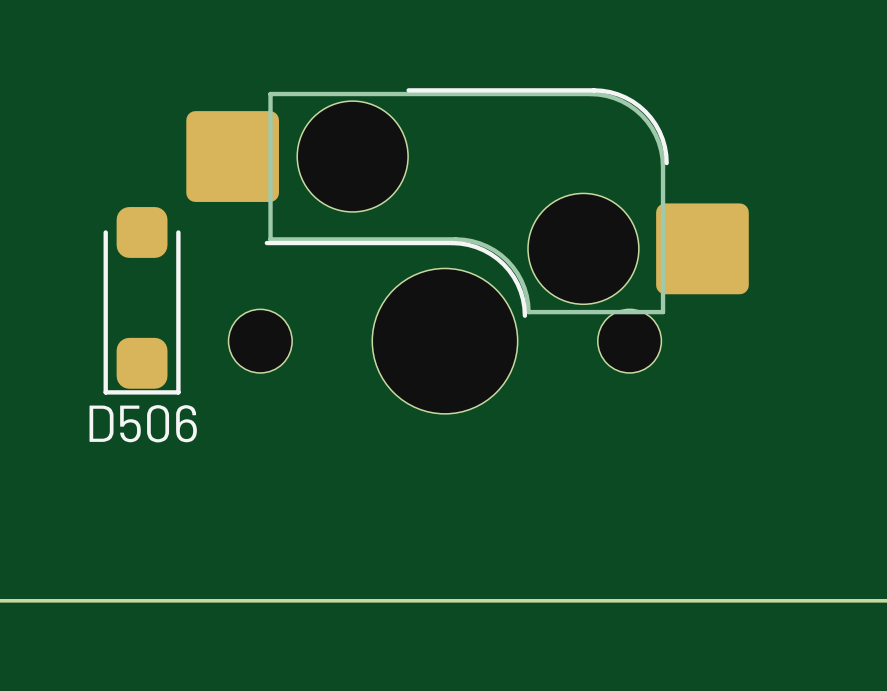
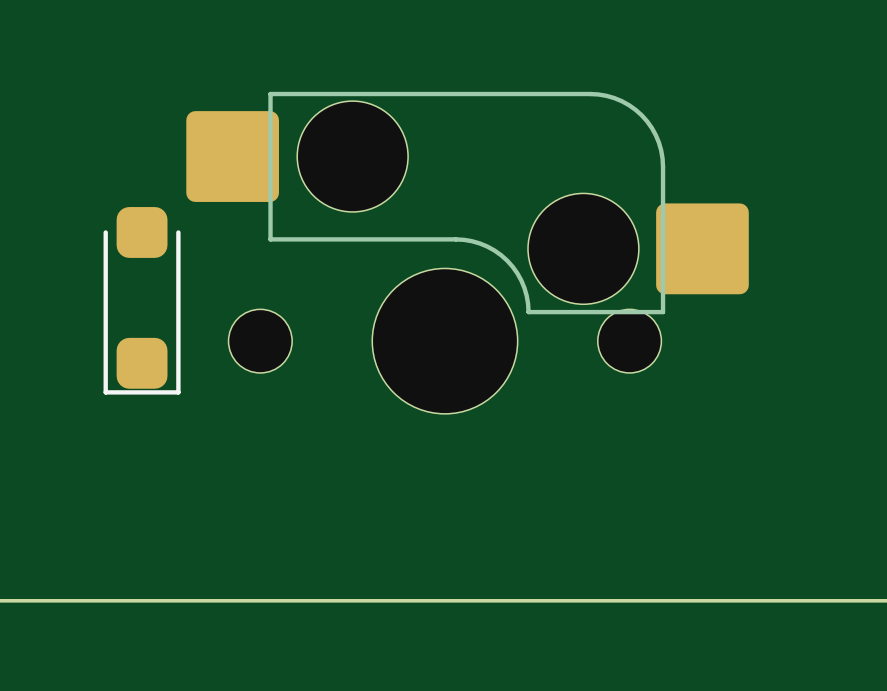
part footprint: [186, 88, 749, 414] -> [186, 91, 749, 414]
D506 name: D506 (143, 423) -> none

